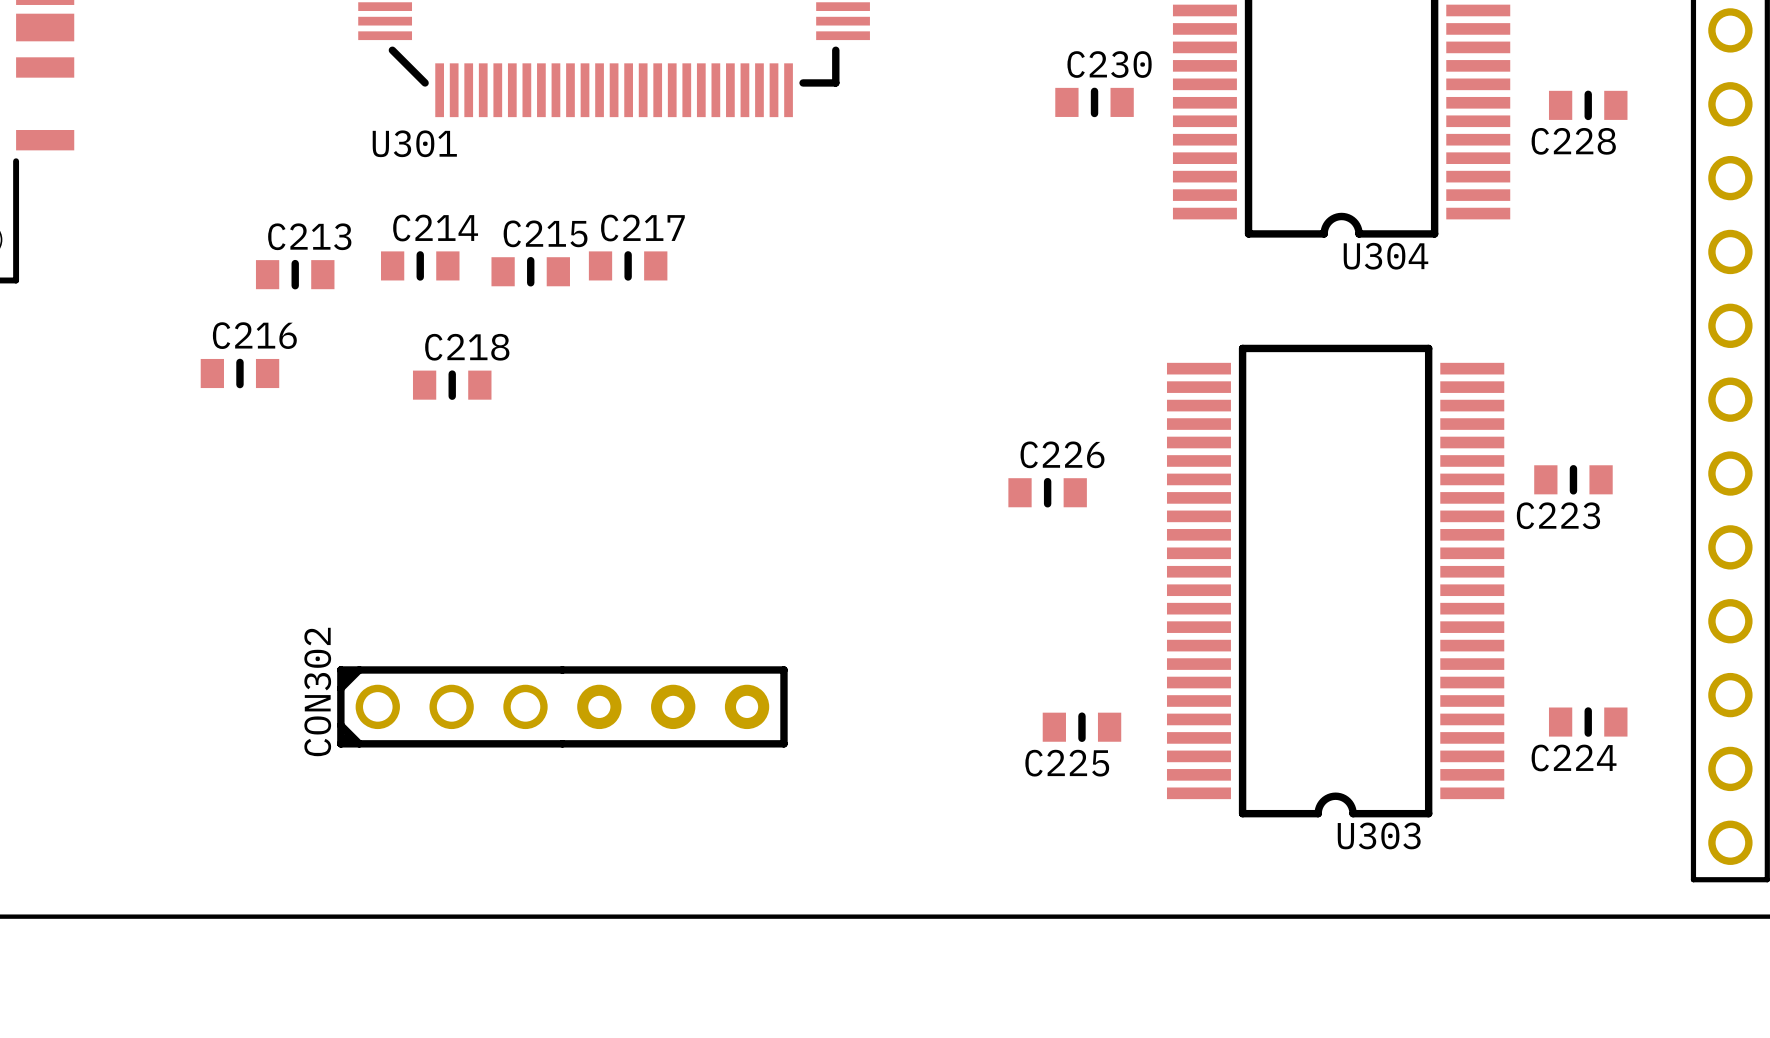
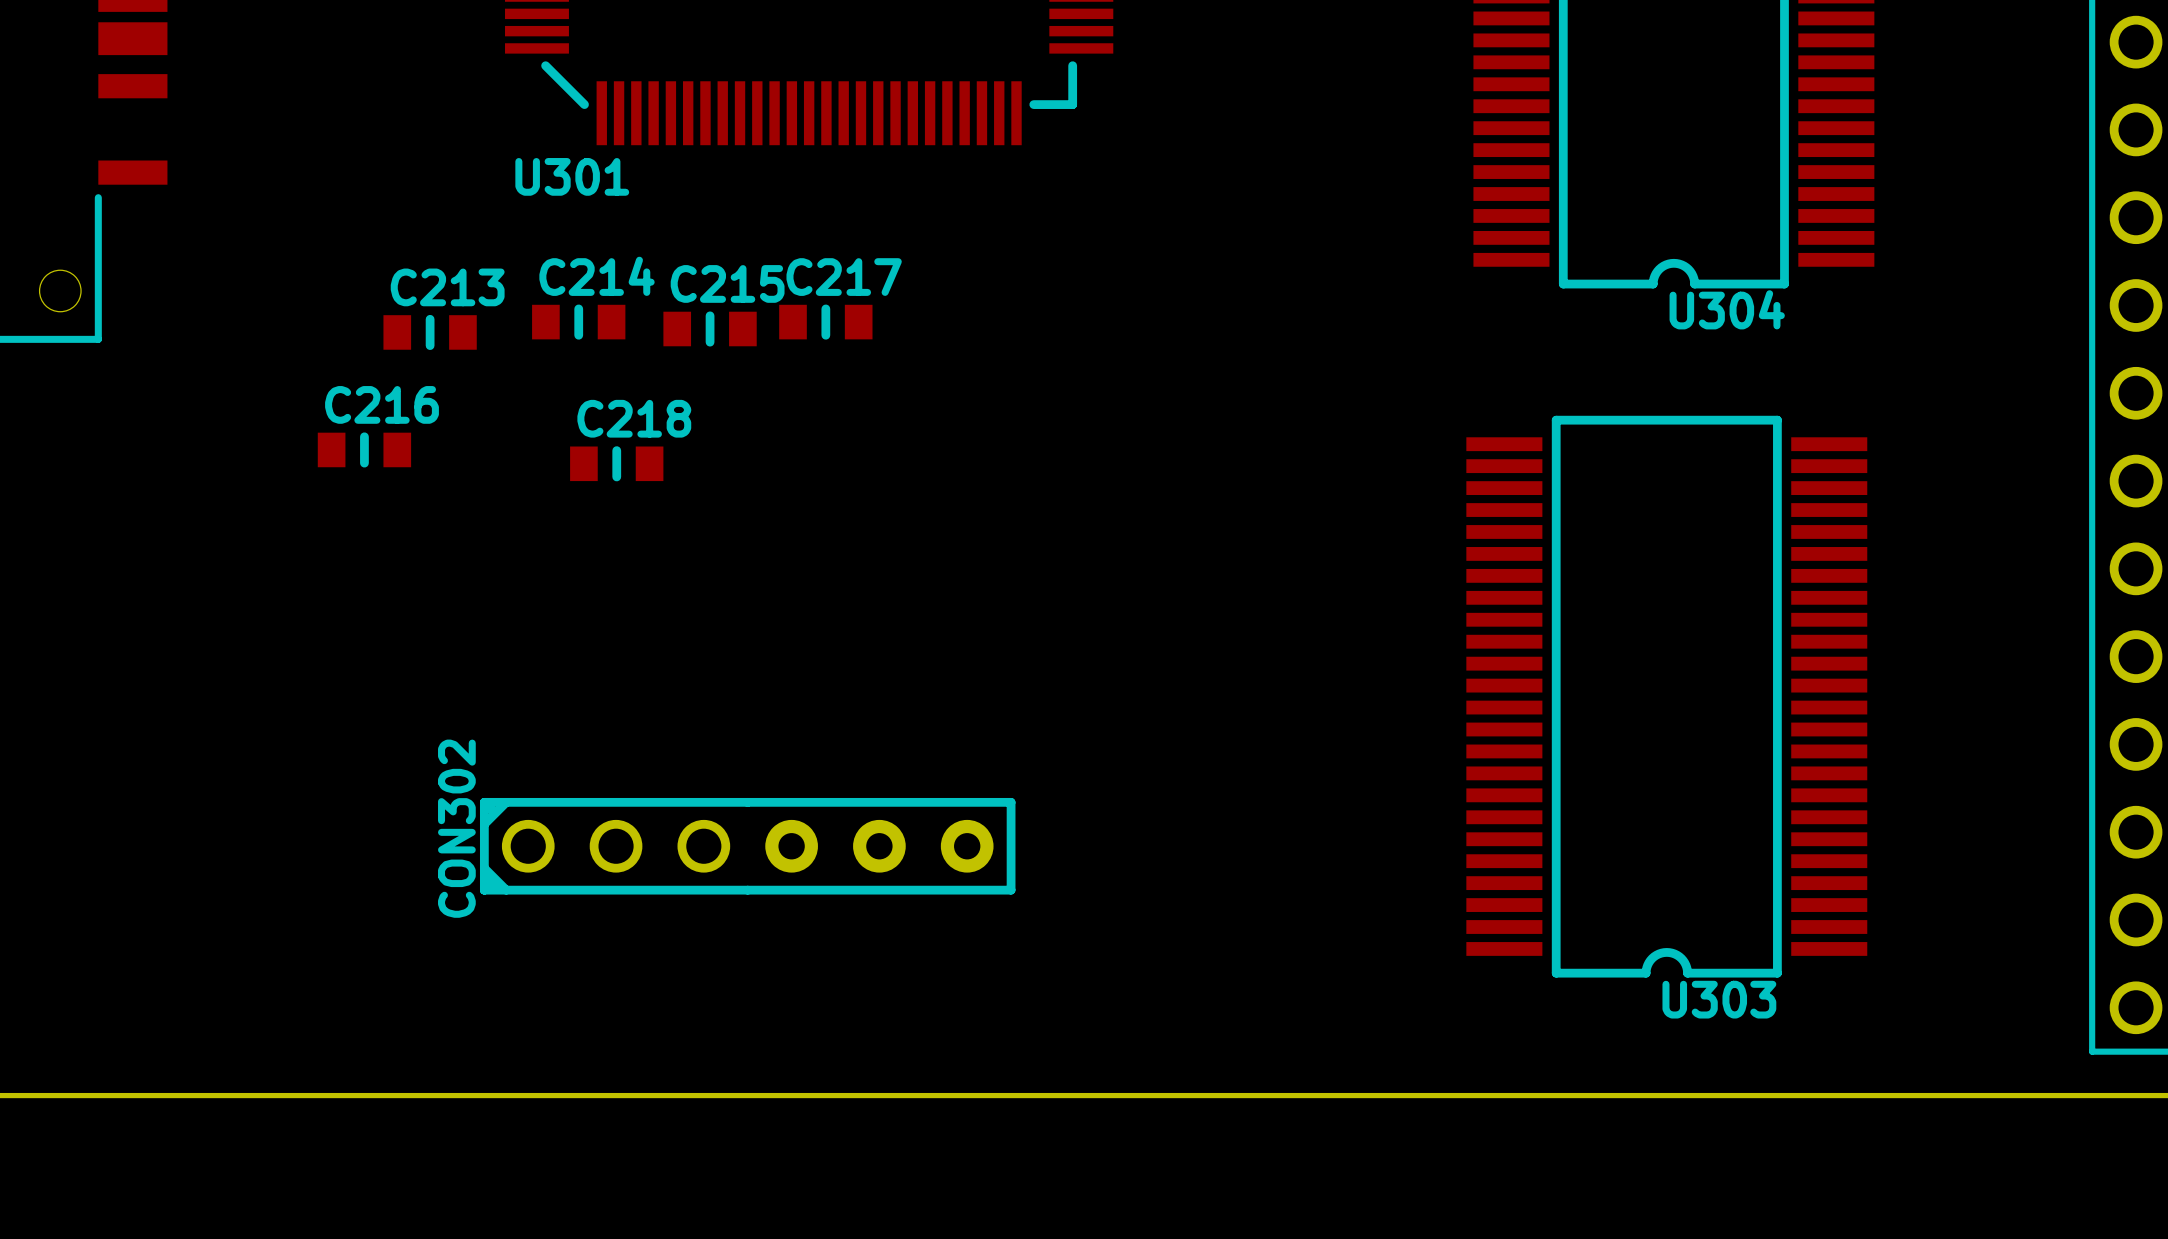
C230: (1094, 102) -> none
C228: (1588, 105) -> none
C223: (1573, 479) -> none
C226: (1047, 492) -> none
C224: (1588, 722) -> none
C225: (1081, 727) -> none

